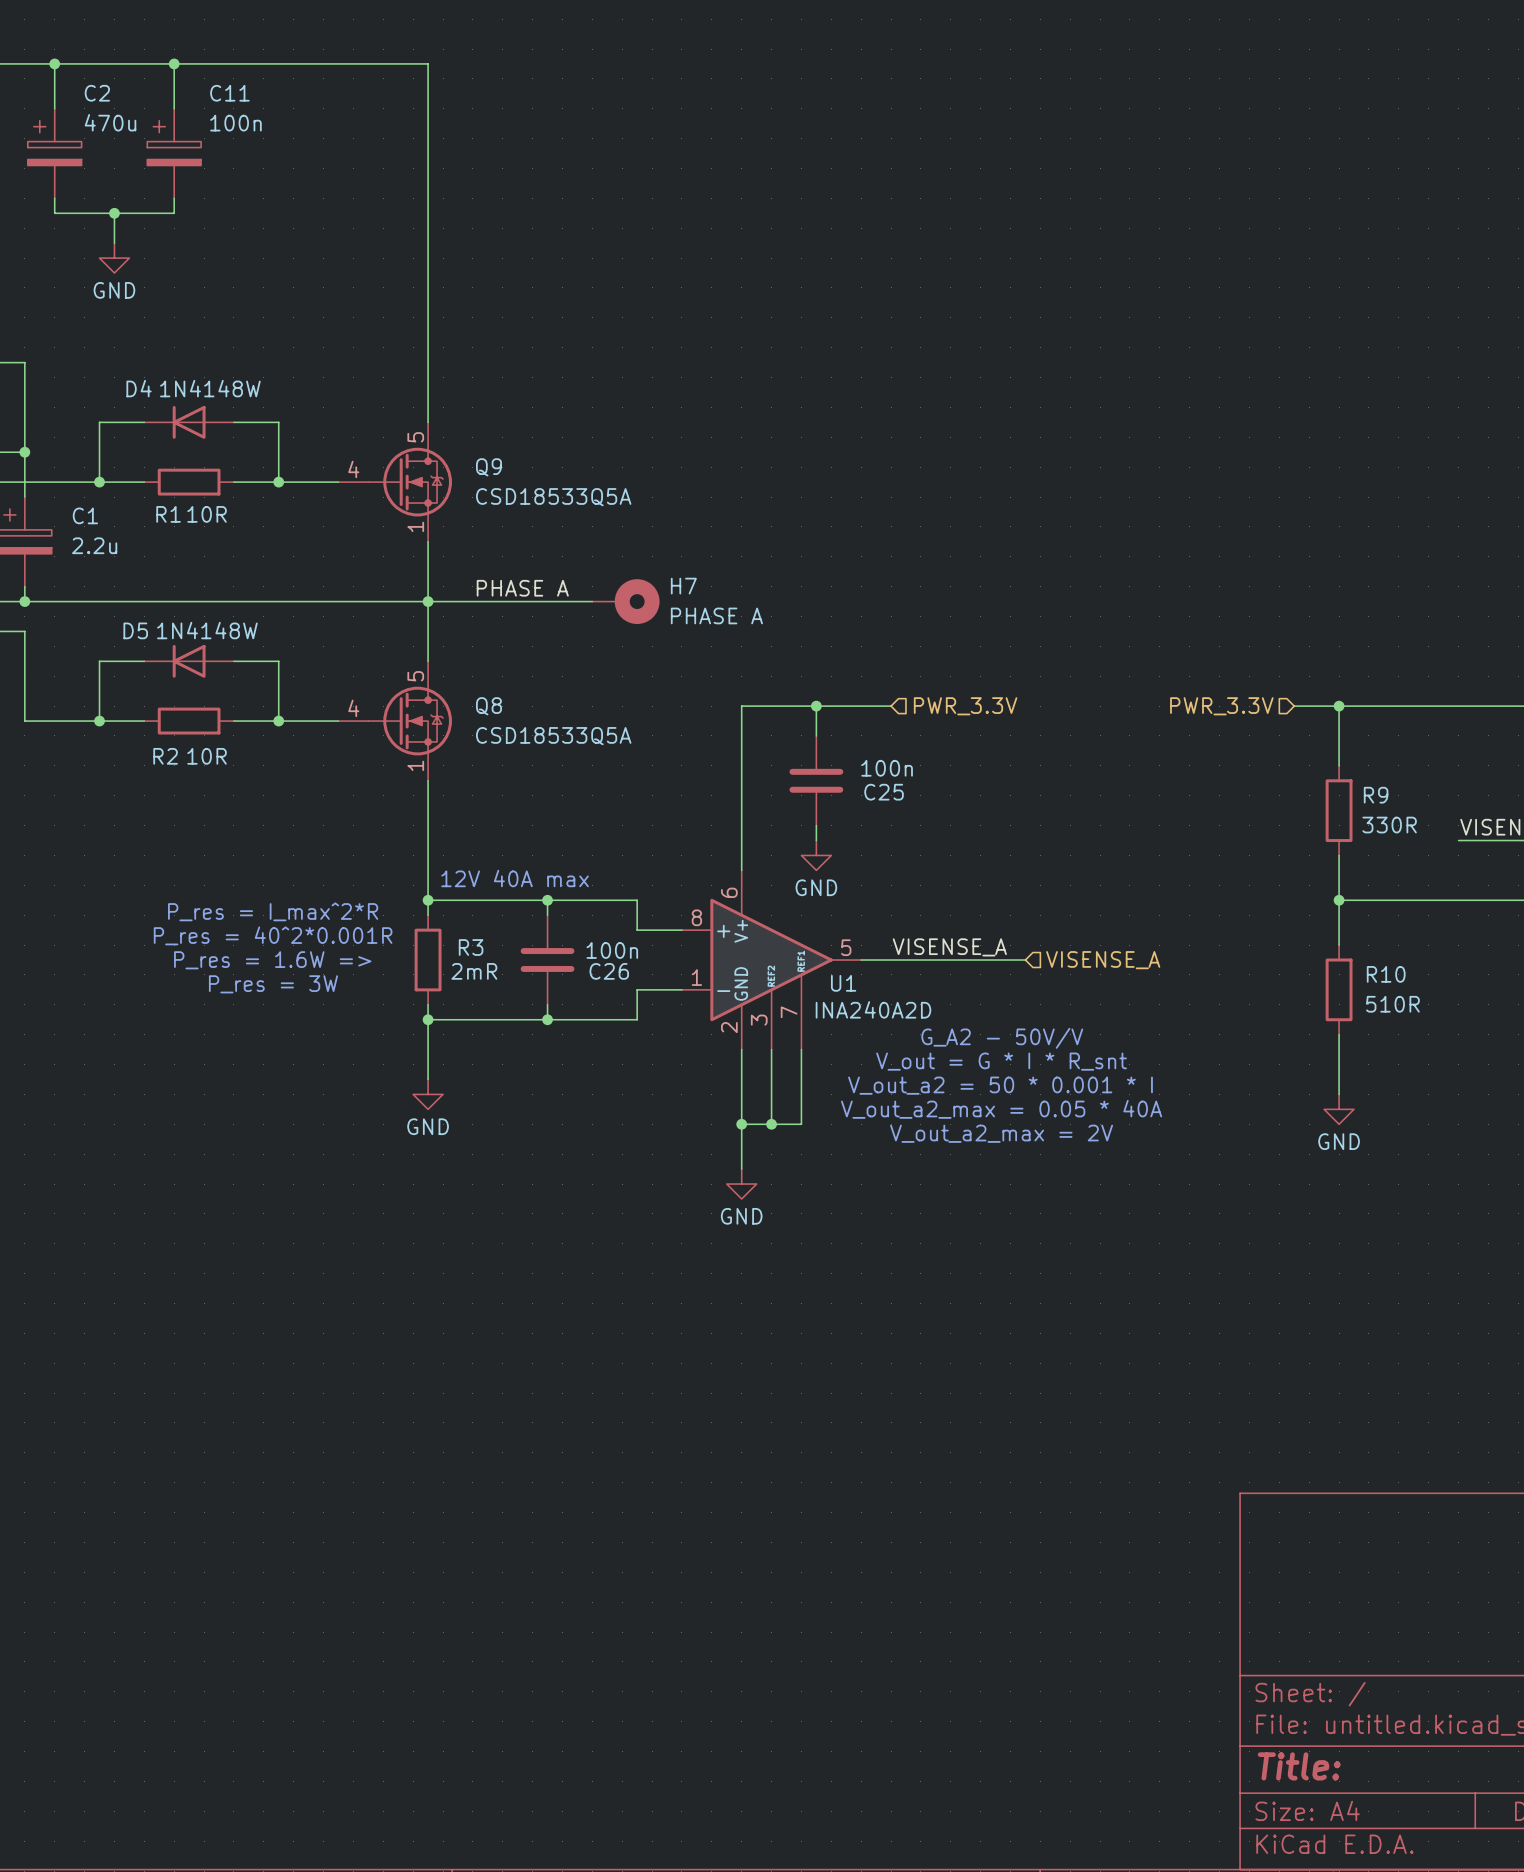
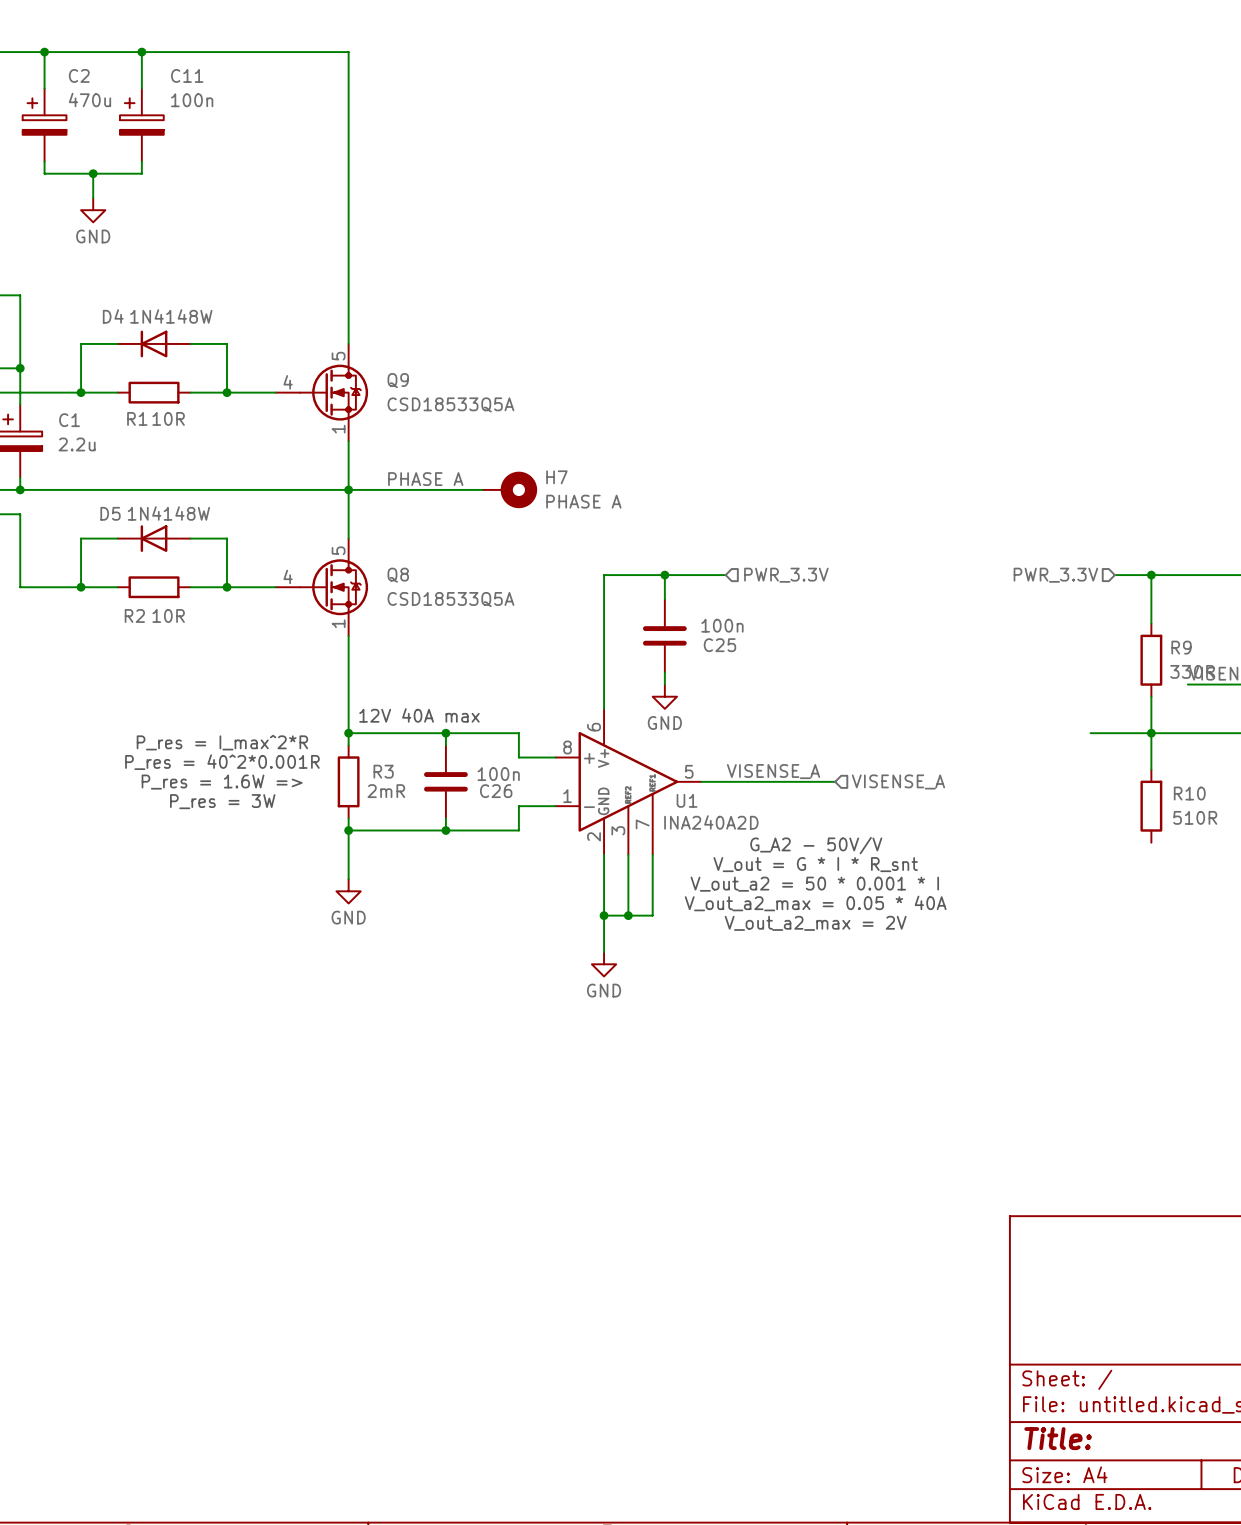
hierarchical label position: PWR_3.3V (1221, 706) -> PWR_3.3V (1055, 575)
wire: (1294, 706) (1368, 706) -> none
wire: (1339, 706) (1339, 765) -> (1151, 575) (1151, 623)
junction: (1339, 706) -> none
junction: none -> (1151, 575)
R9 position: (1339, 810) -> (1151, 660)
wire: (1339, 855) (1339, 945) -> (1151, 696) (1151, 769)
junction: (1339, 900) -> none
junction: none -> (1151, 733)
R10 position: (1339, 989) -> (1151, 806)
wire: (1339, 1034) (1339, 1094) -> none
power symbol: GND (1339, 1109) -> none

